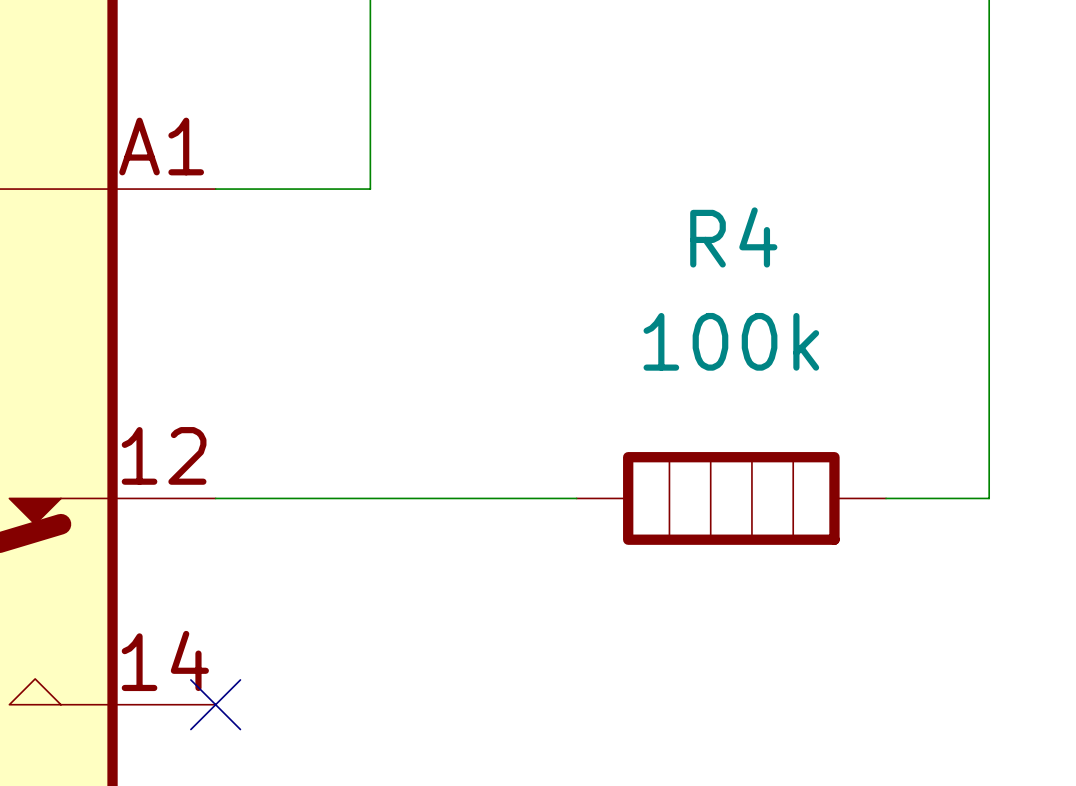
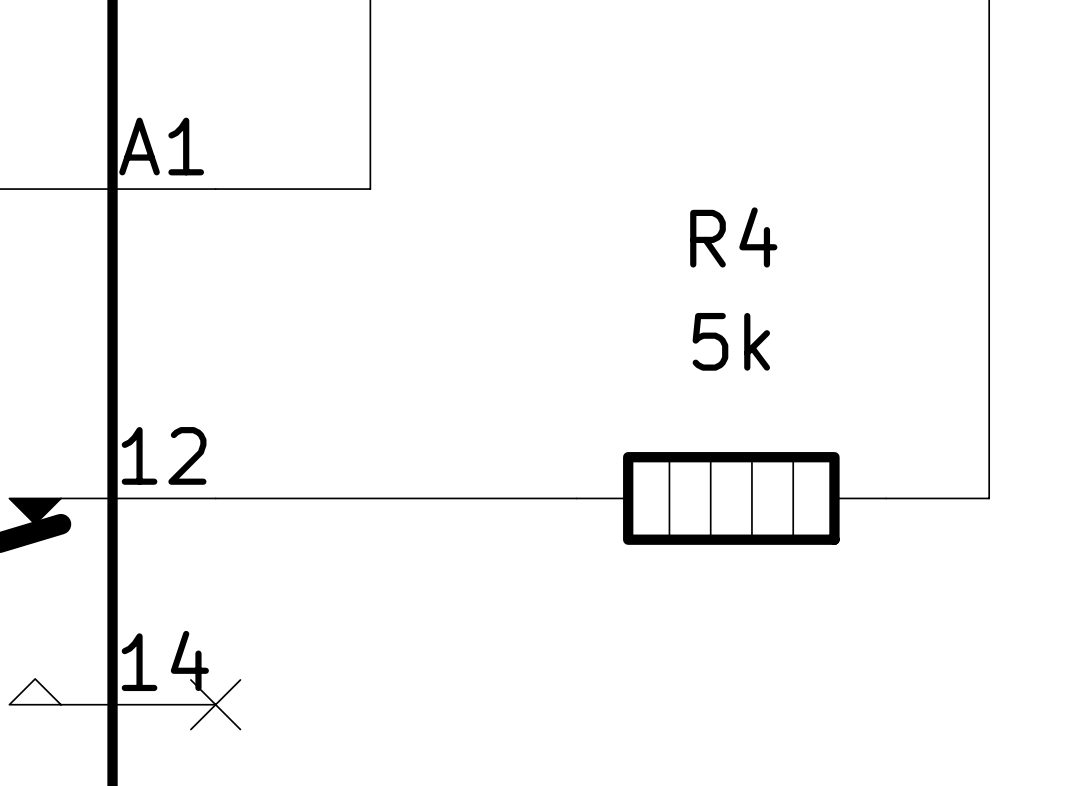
R4 value: 100k (731, 341) -> 5k (731, 341)

